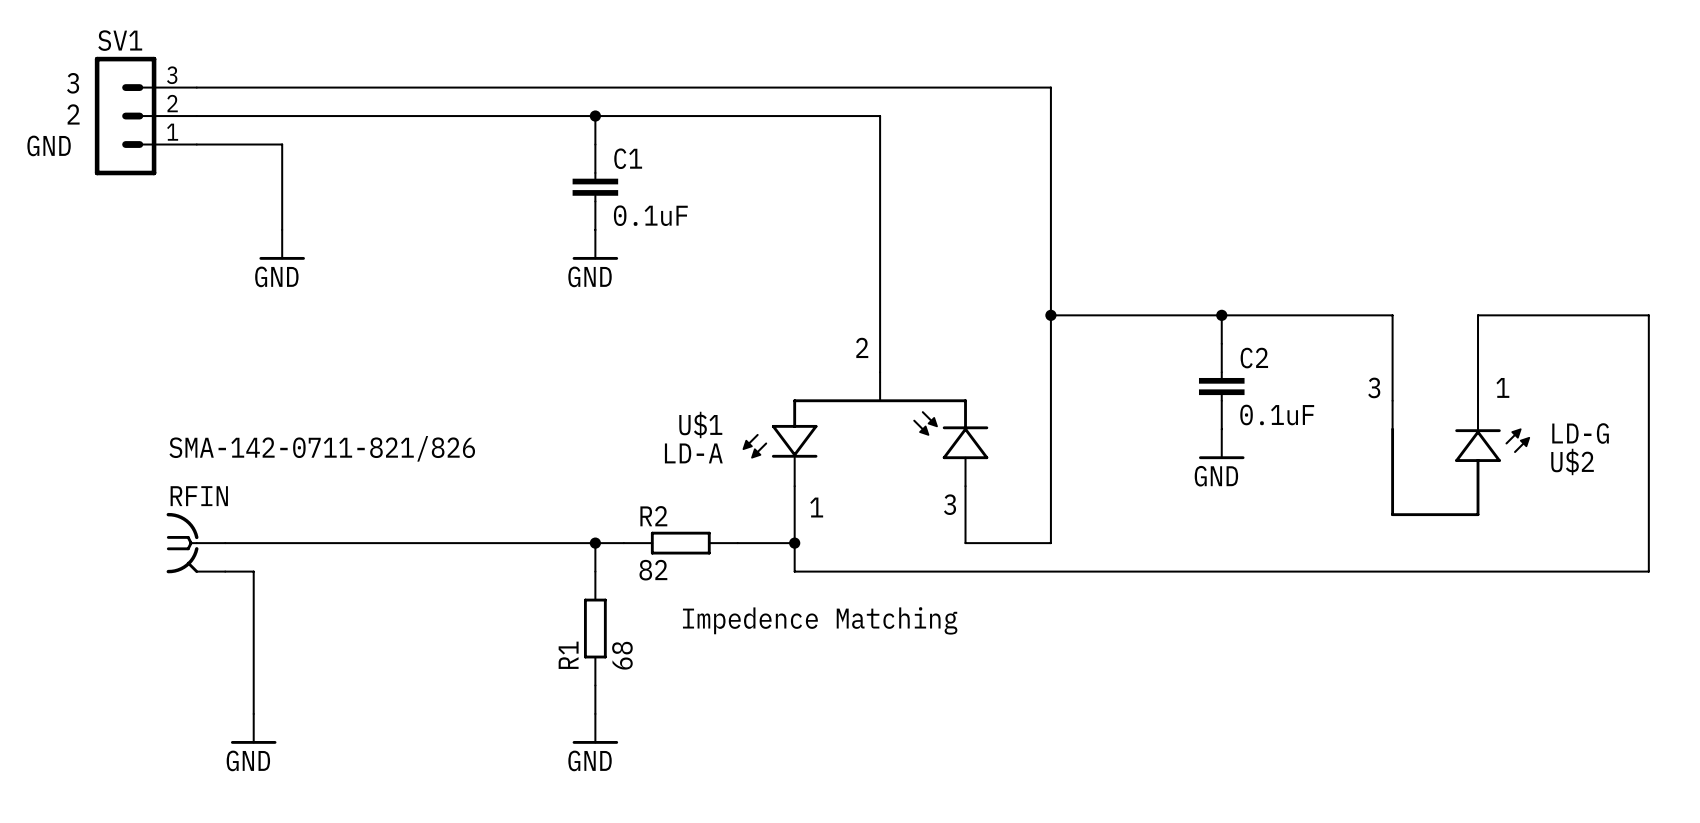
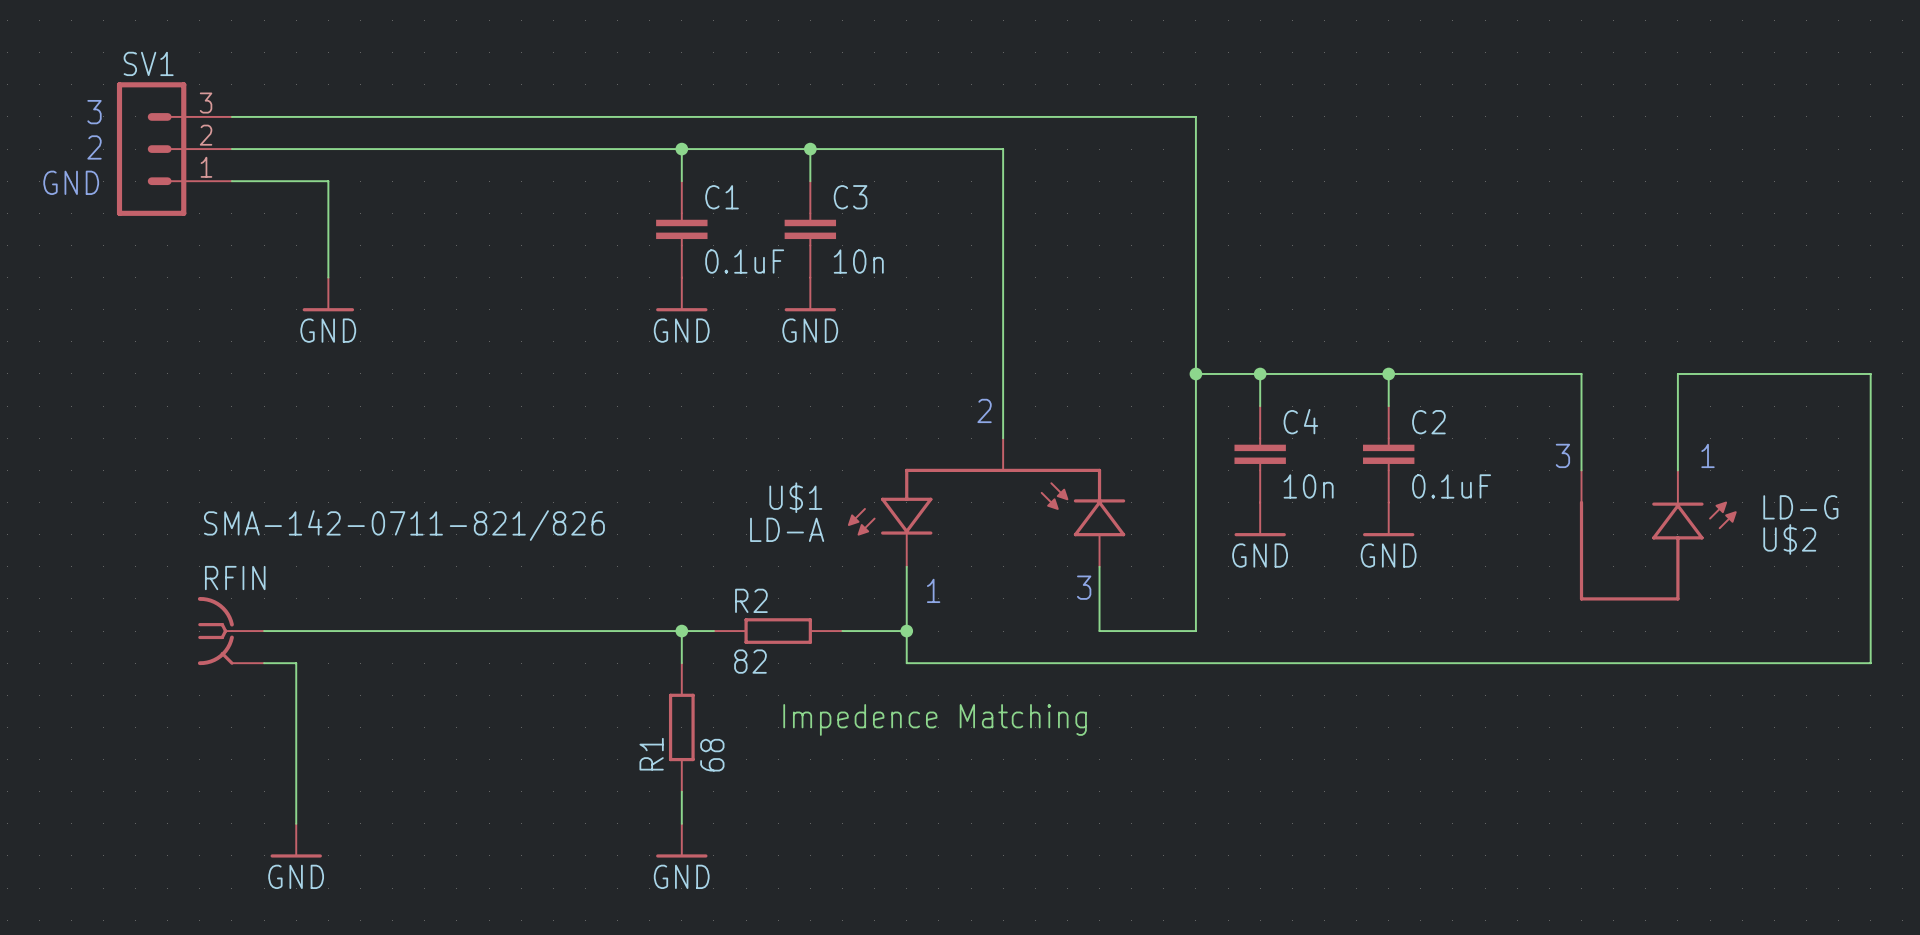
wire: none -> (810, 149) (810, 181)
junction: none -> (810, 149)
C3: none -> 10n (810, 229)
power symbol: none -> GND (810, 294)
wire: none -> (1260, 373) (1260, 406)
junction: none -> (1260, 373)
C4: none -> 10n (1260, 454)
power symbol: none -> GND (1260, 519)

